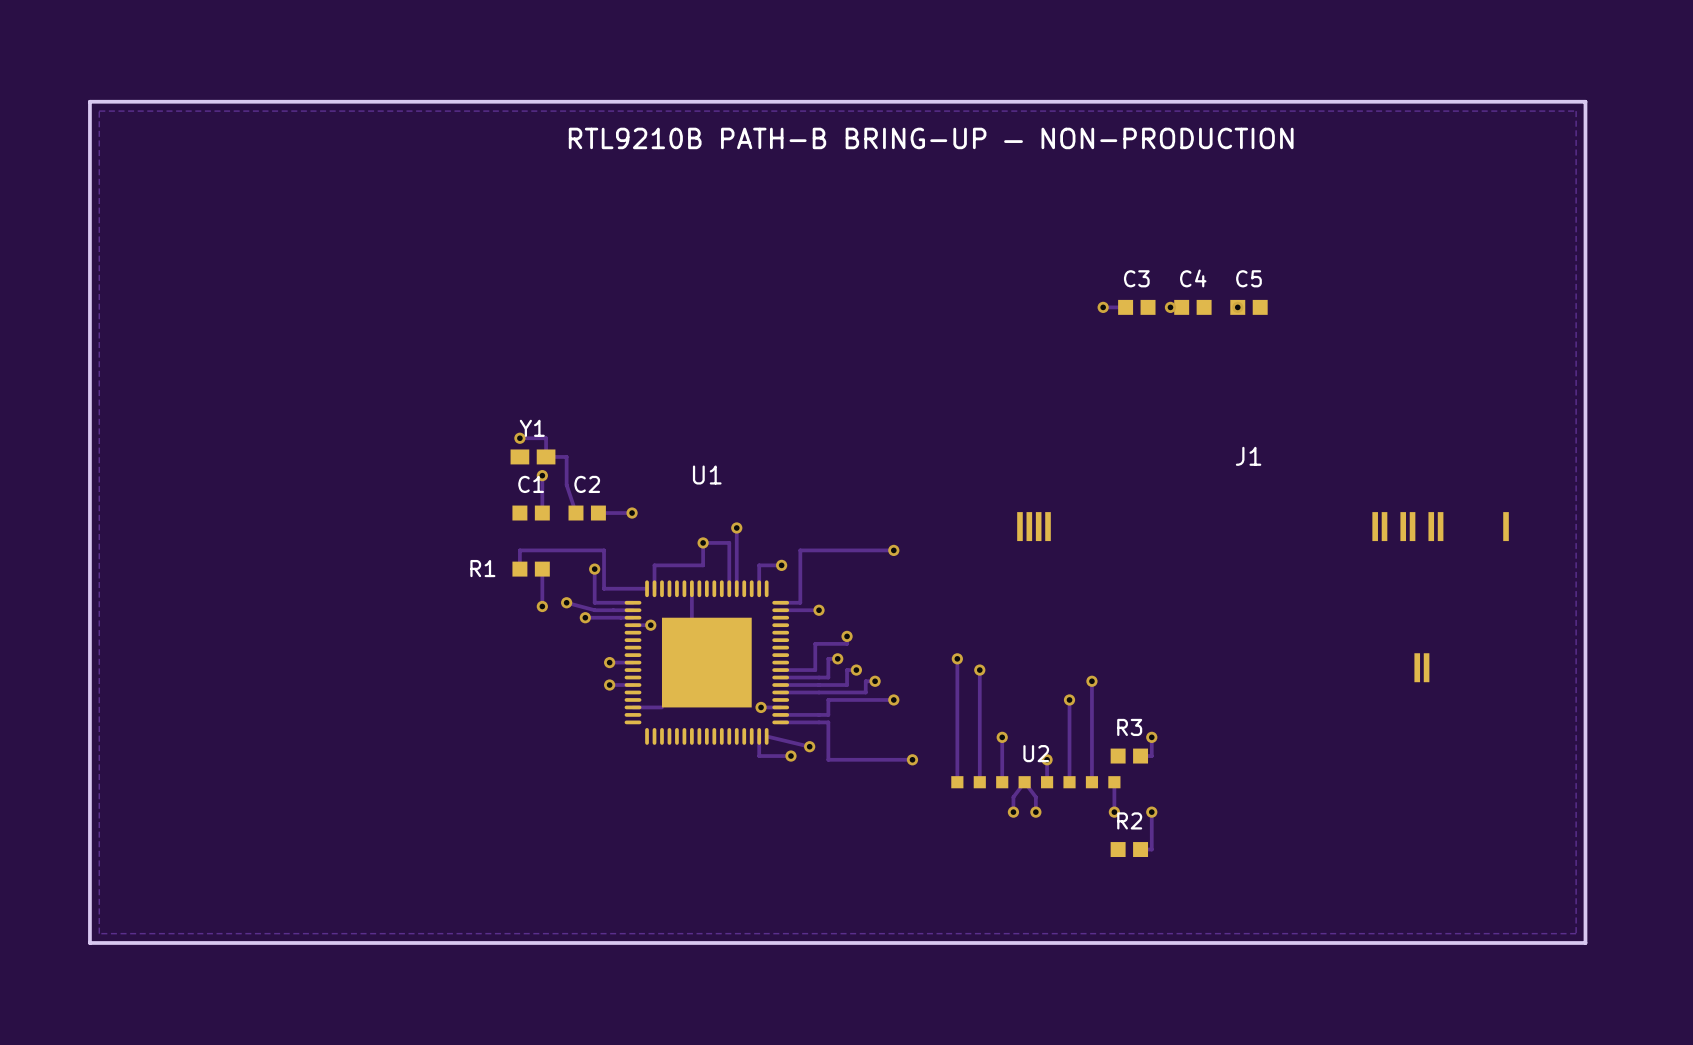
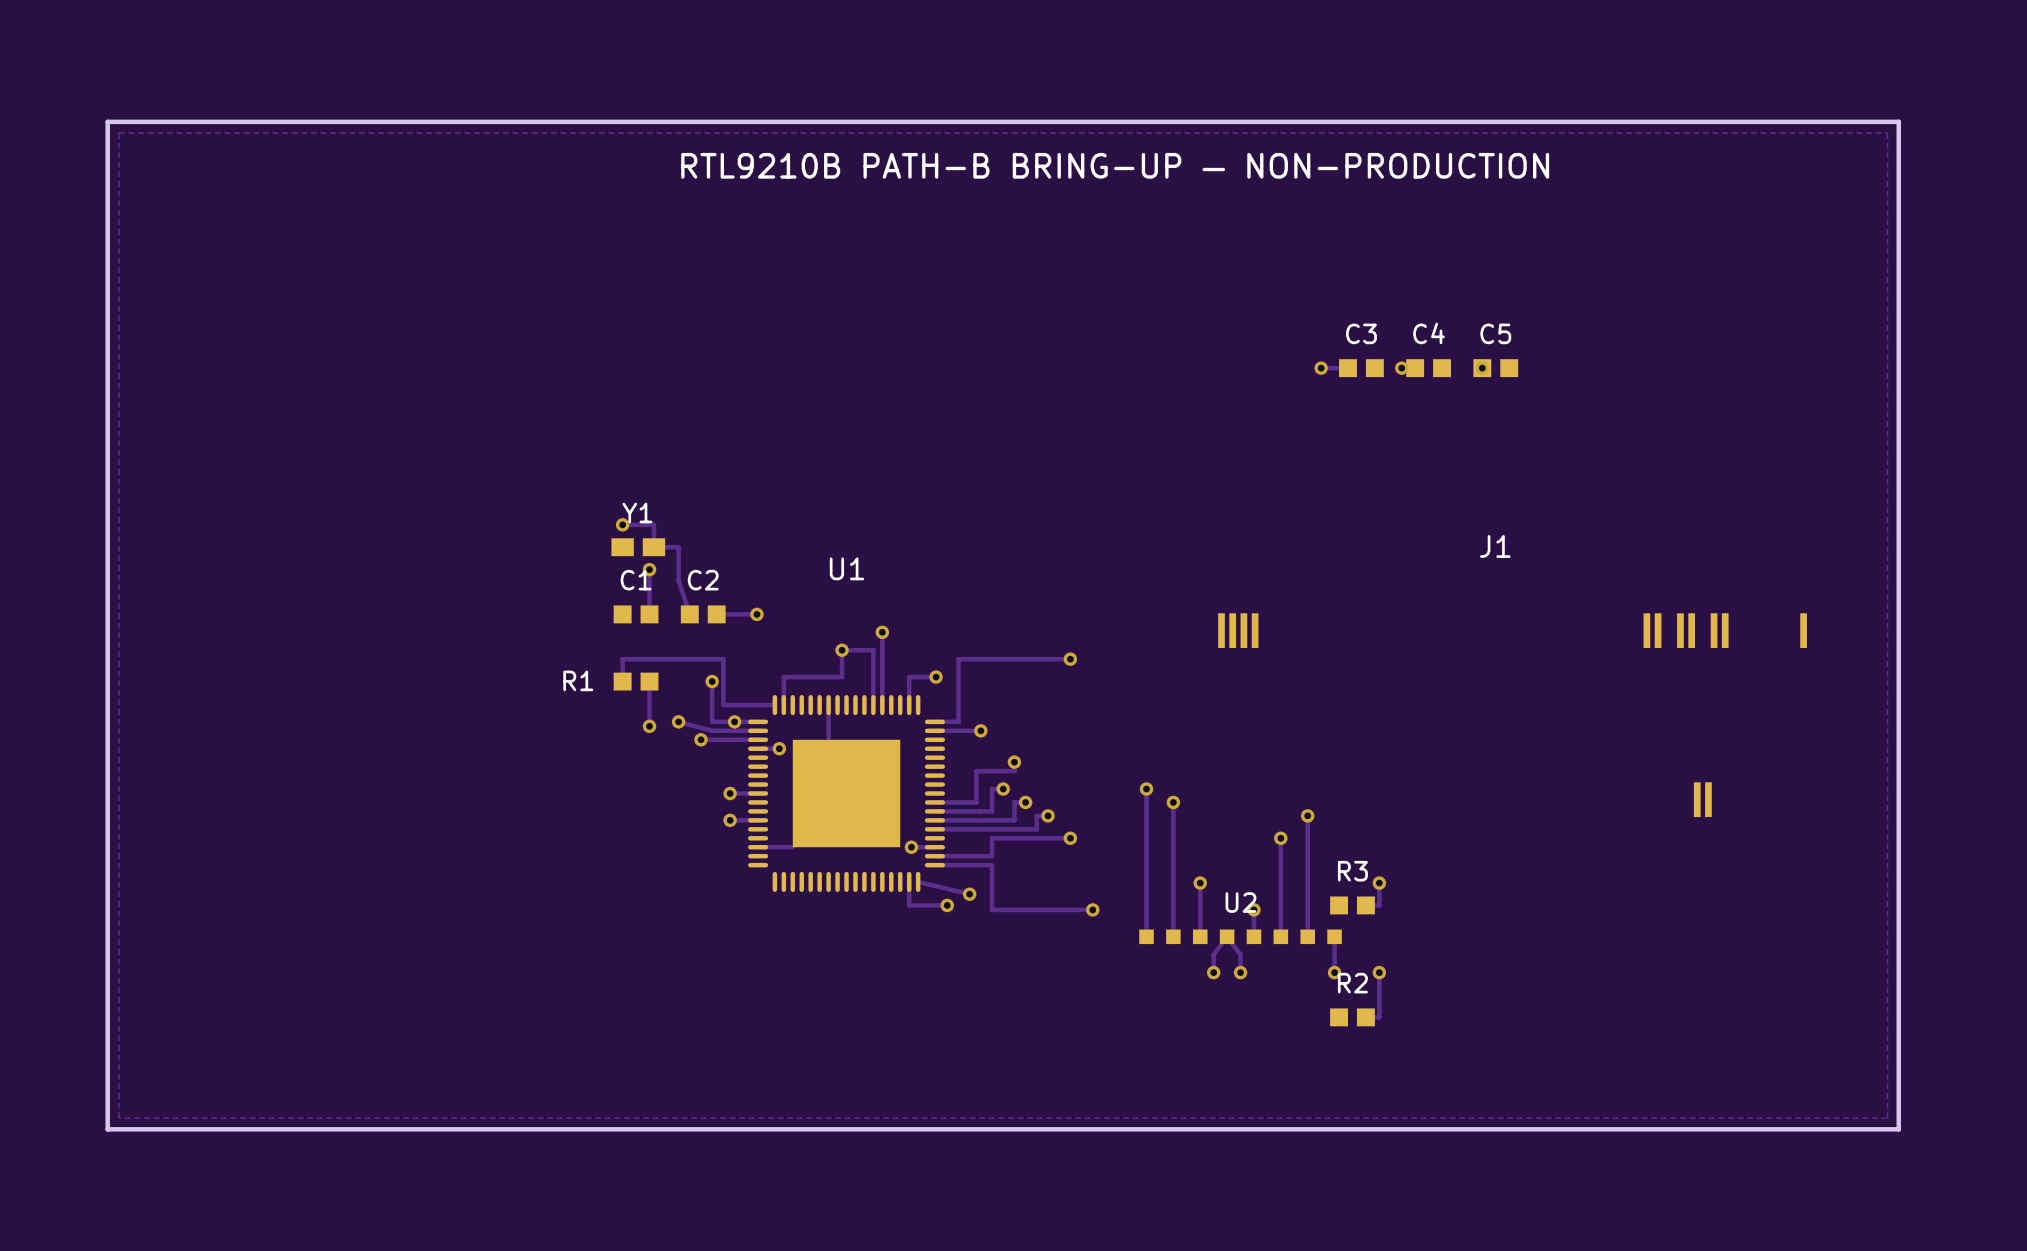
via: none -> (734, 721)

